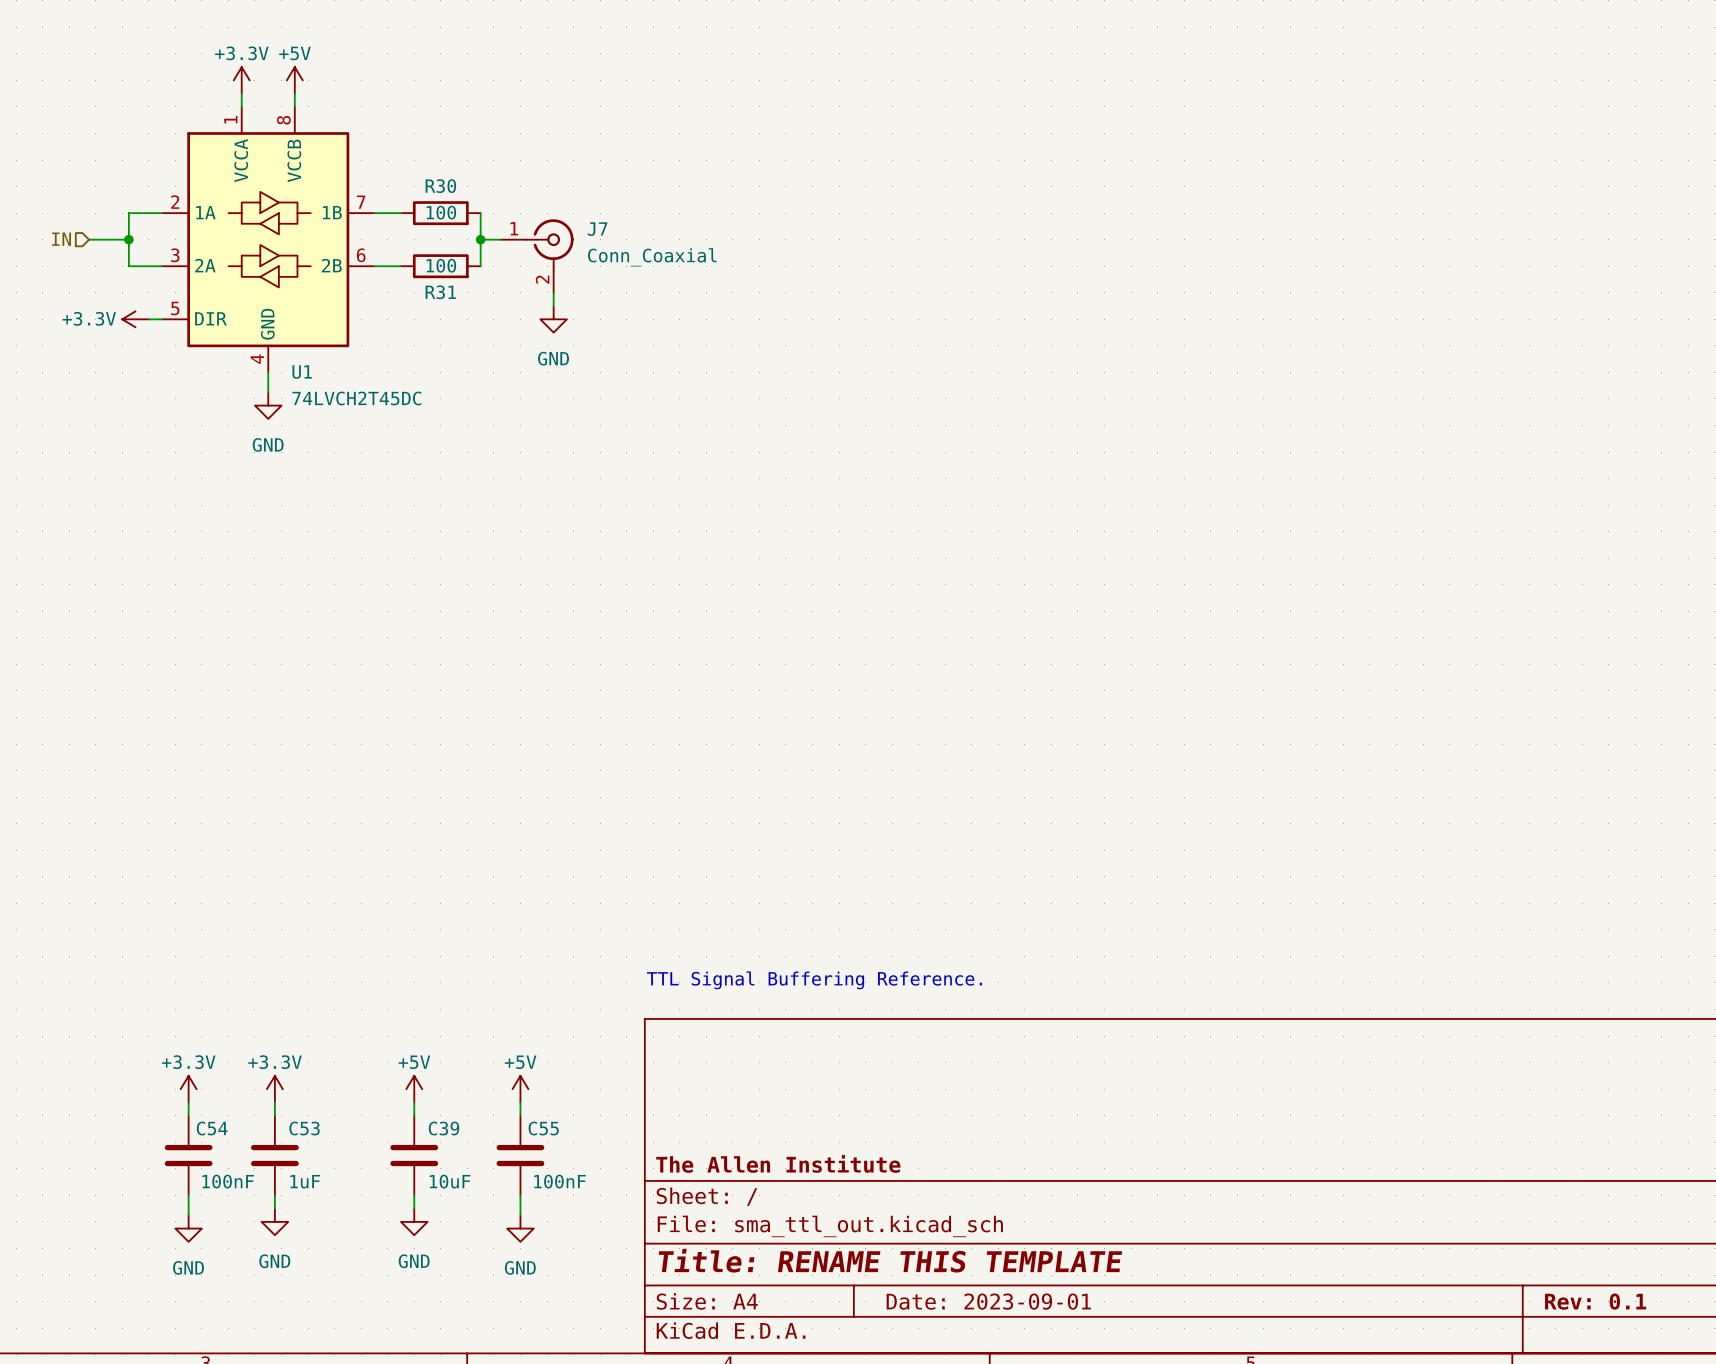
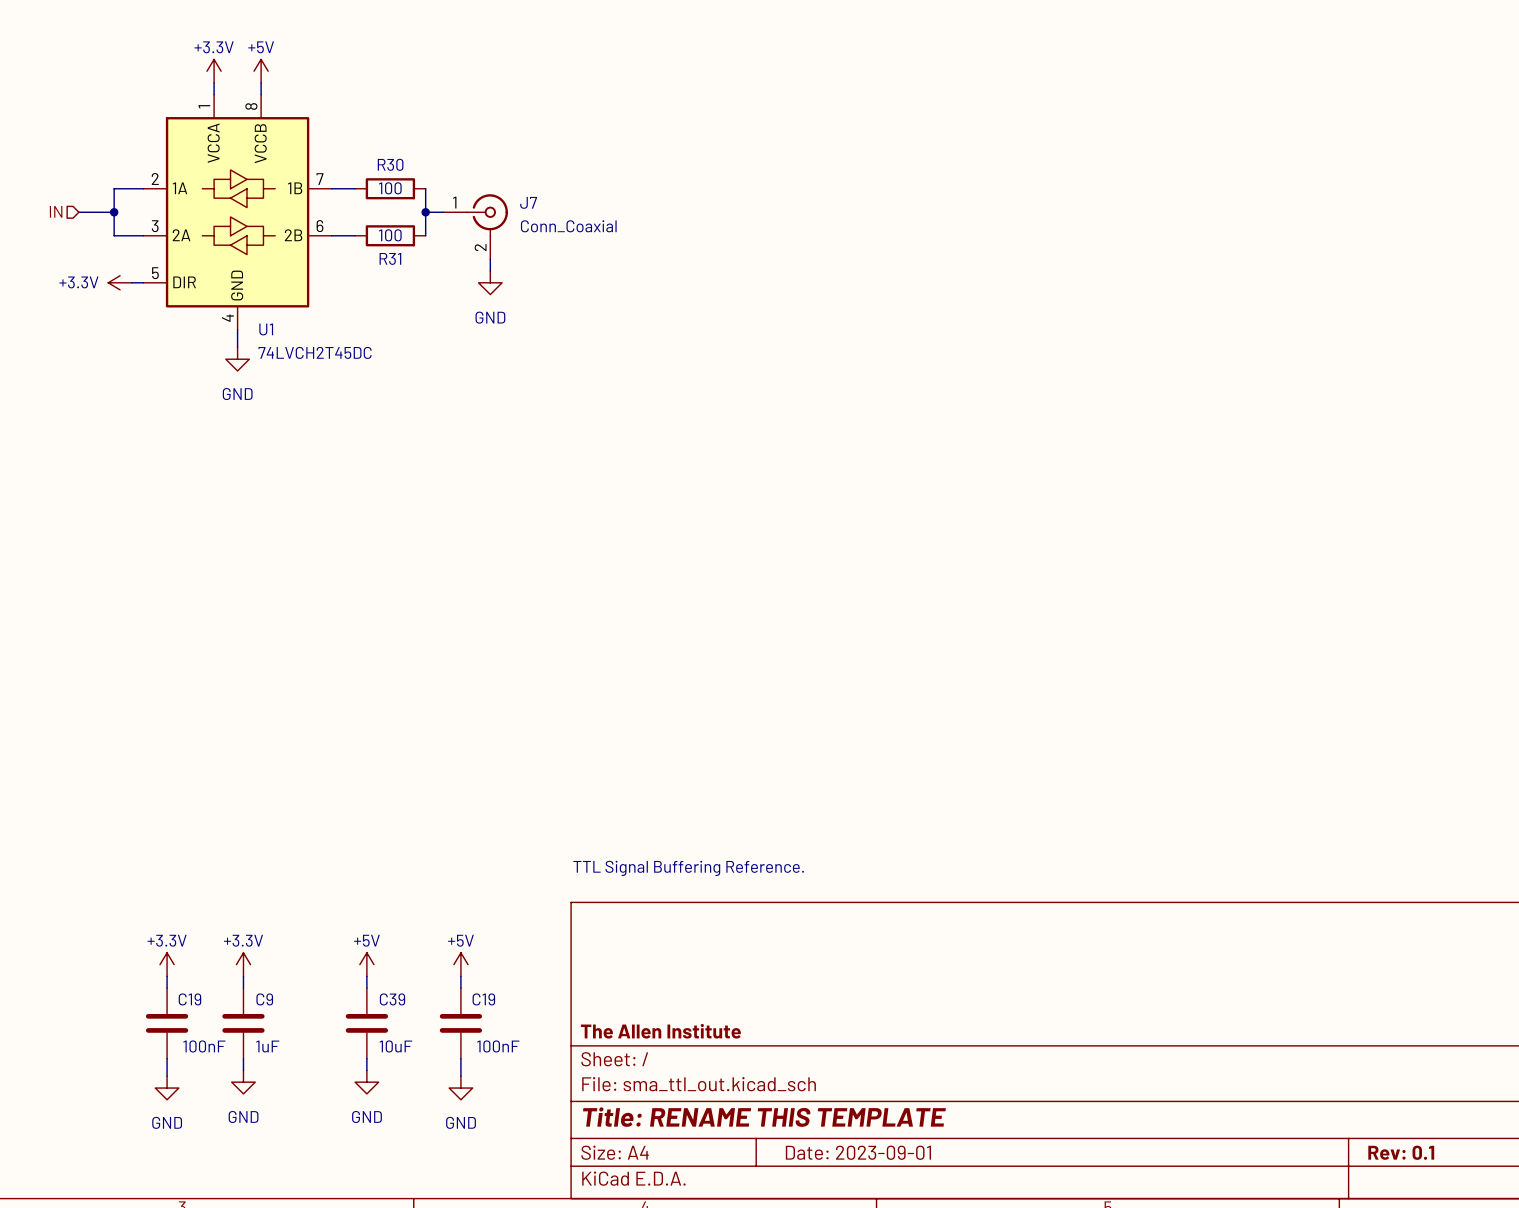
C54 name: C54 (212, 1128) -> C19 (189, 999)
C53 name: C53 (304, 1128) -> C9 (264, 999)
C55 name: C55 (543, 1128) -> C19 (483, 999)

